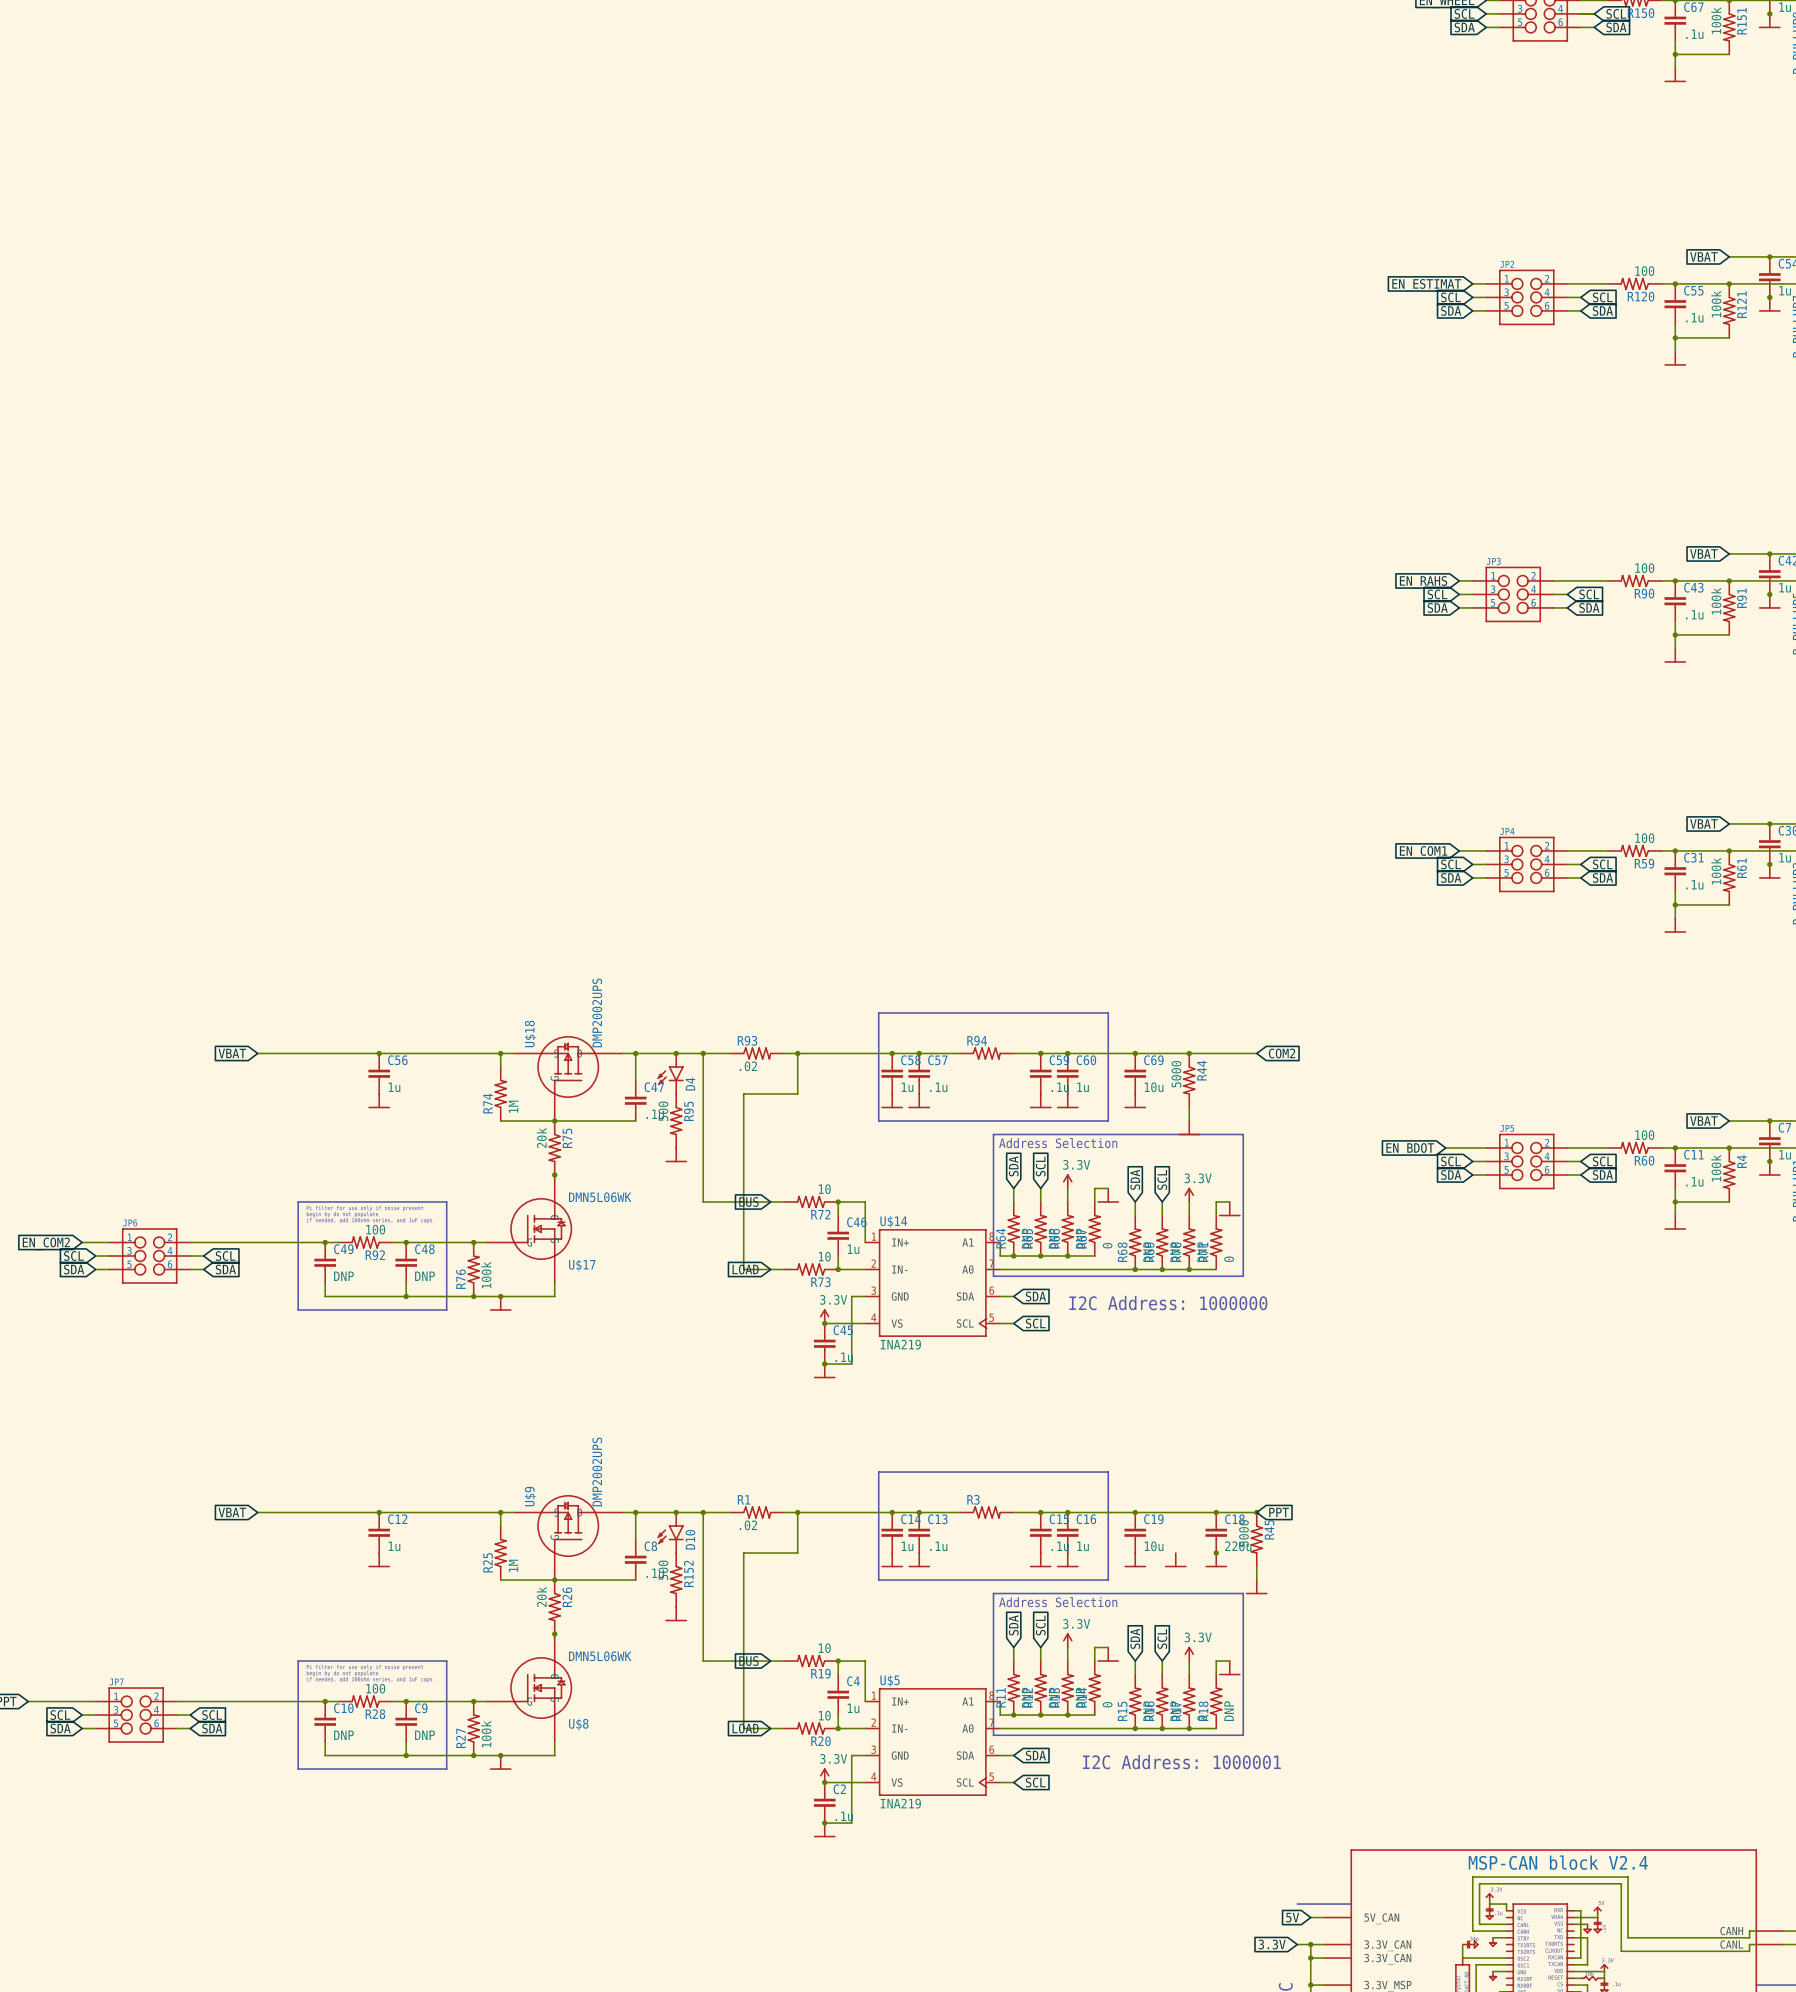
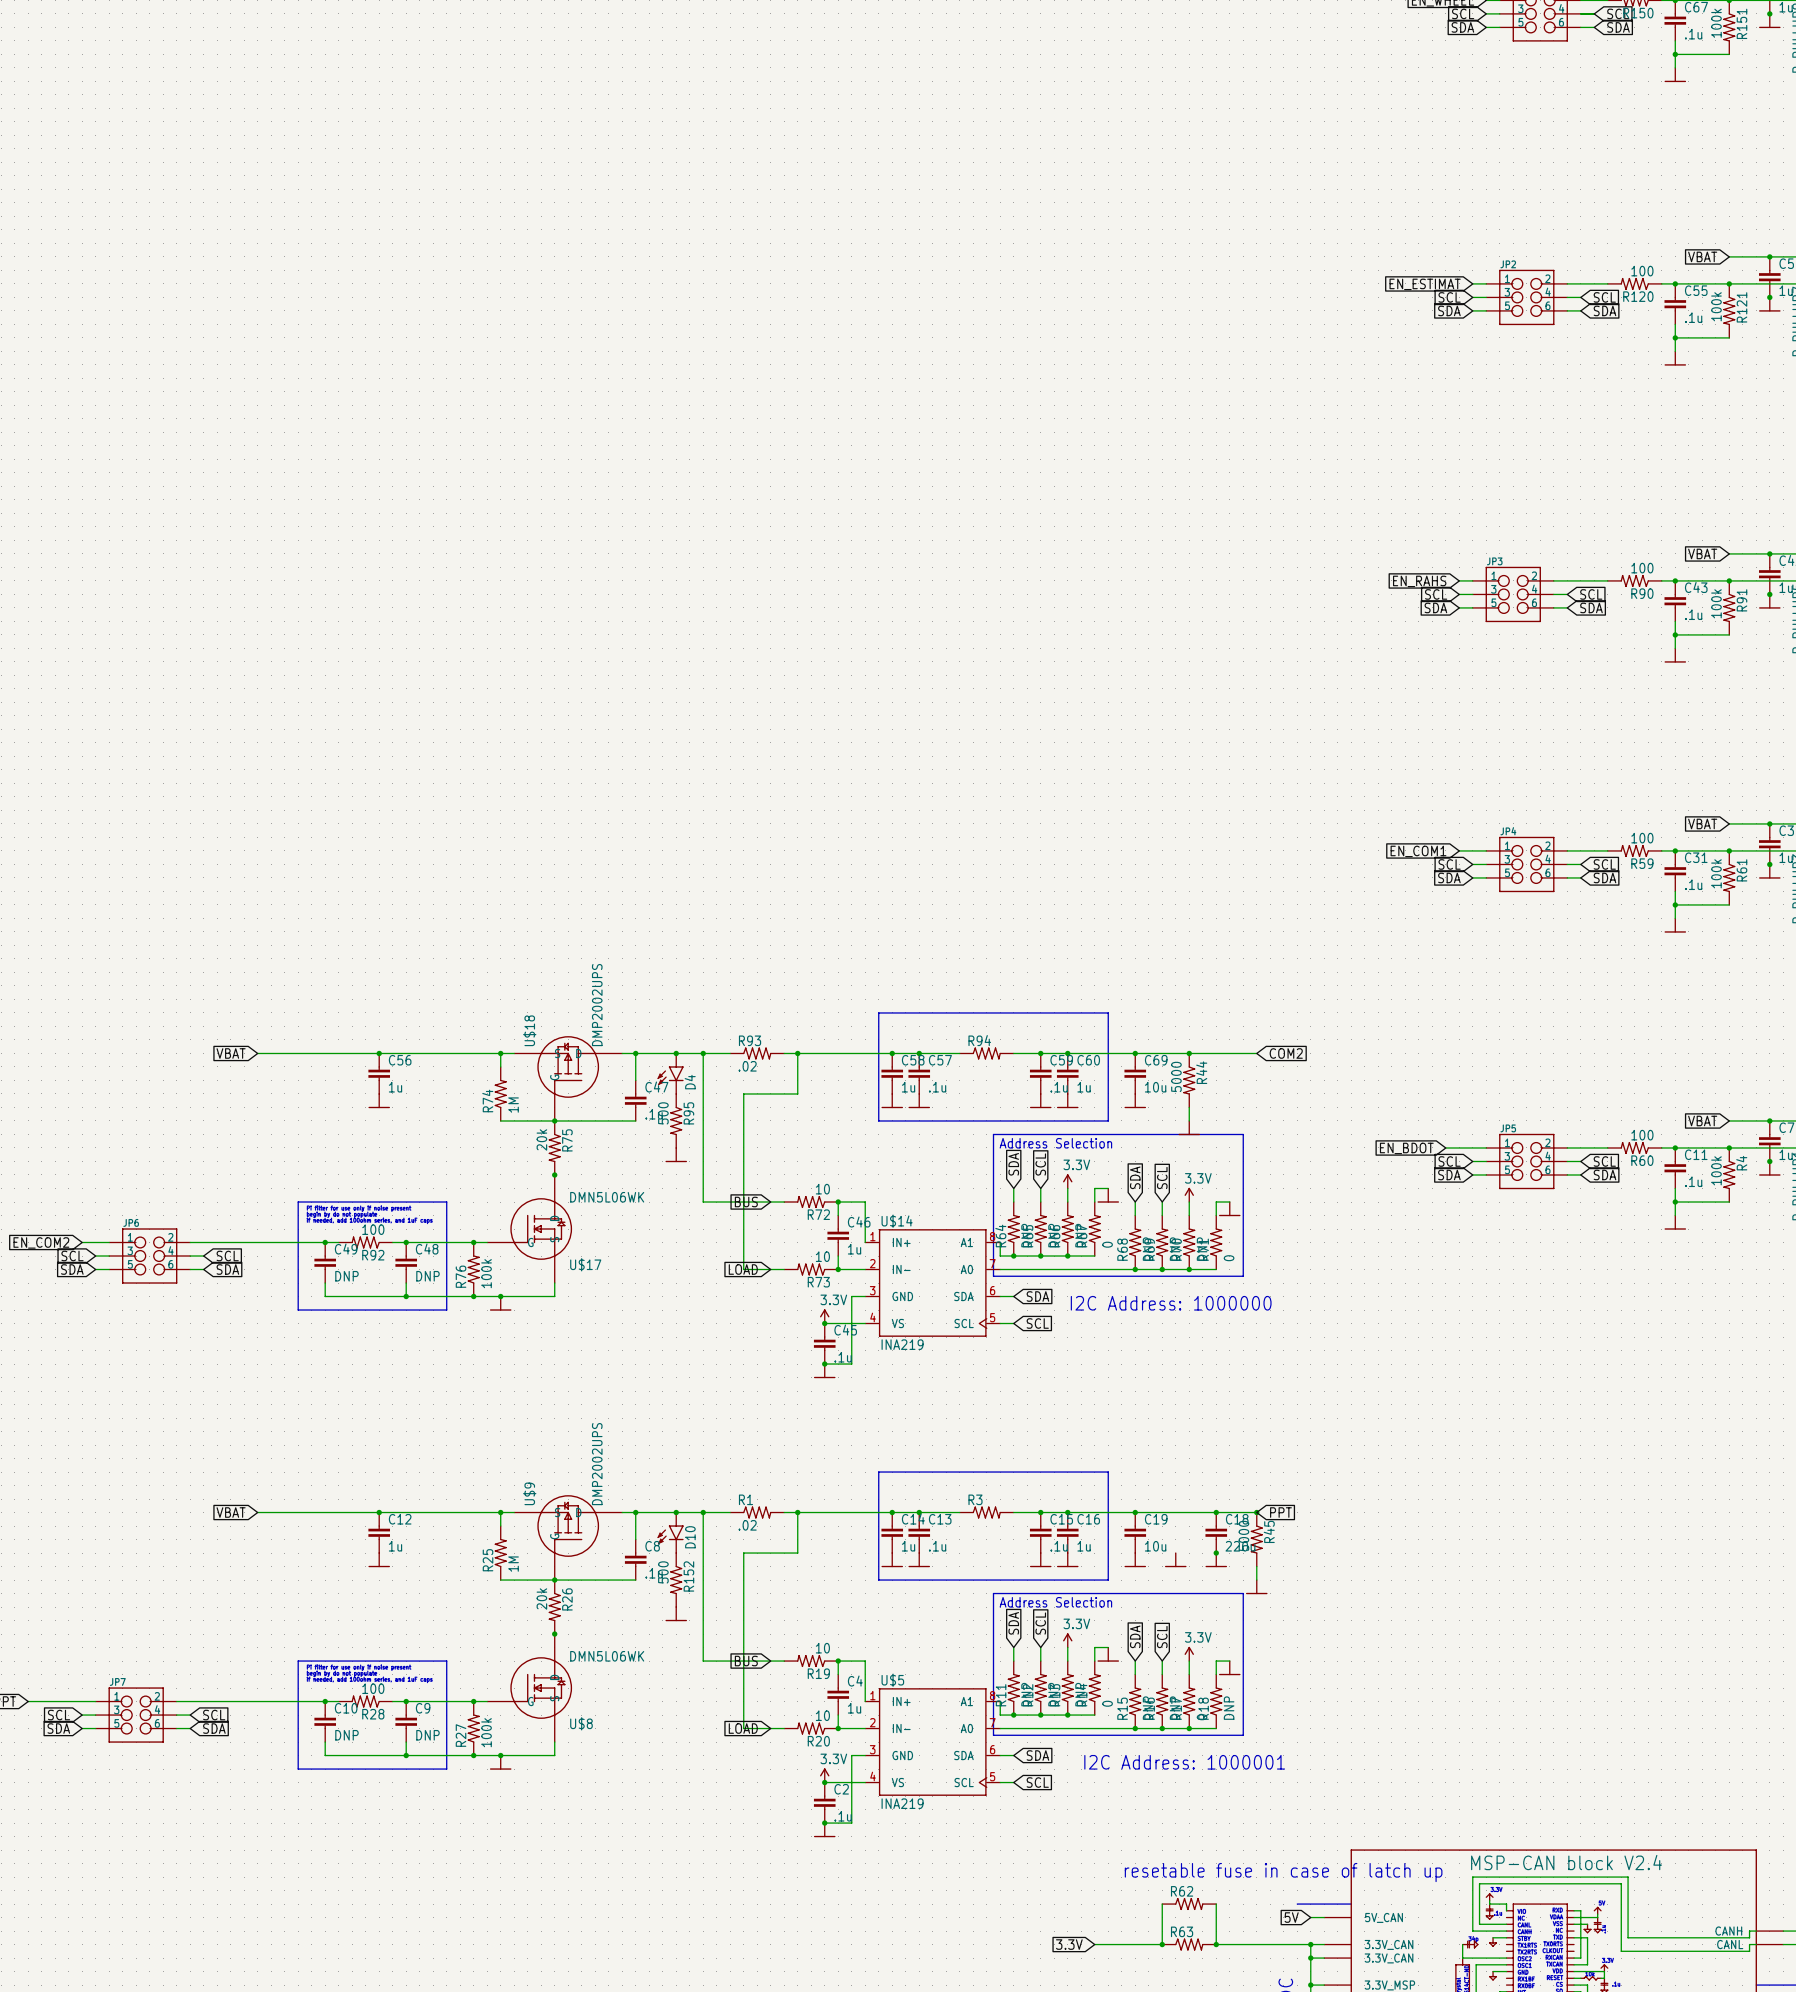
text: none -> resetable fuse in case of latch up (1283, 1872)
wire: none -> (1162, 1904) (1162, 1944) (1094, 1944)
R62: none -> (1189, 1904)
wire: none -> (1216, 1904) (1216, 1944) (1297, 1944)
global label: none -> 3.3V (1069, 1944)
junction: none -> (1162, 1944)
R63: none -> (1189, 1944)
junction: none -> (1216, 1944)
global label: 3.3V (1272, 1944) -> none

